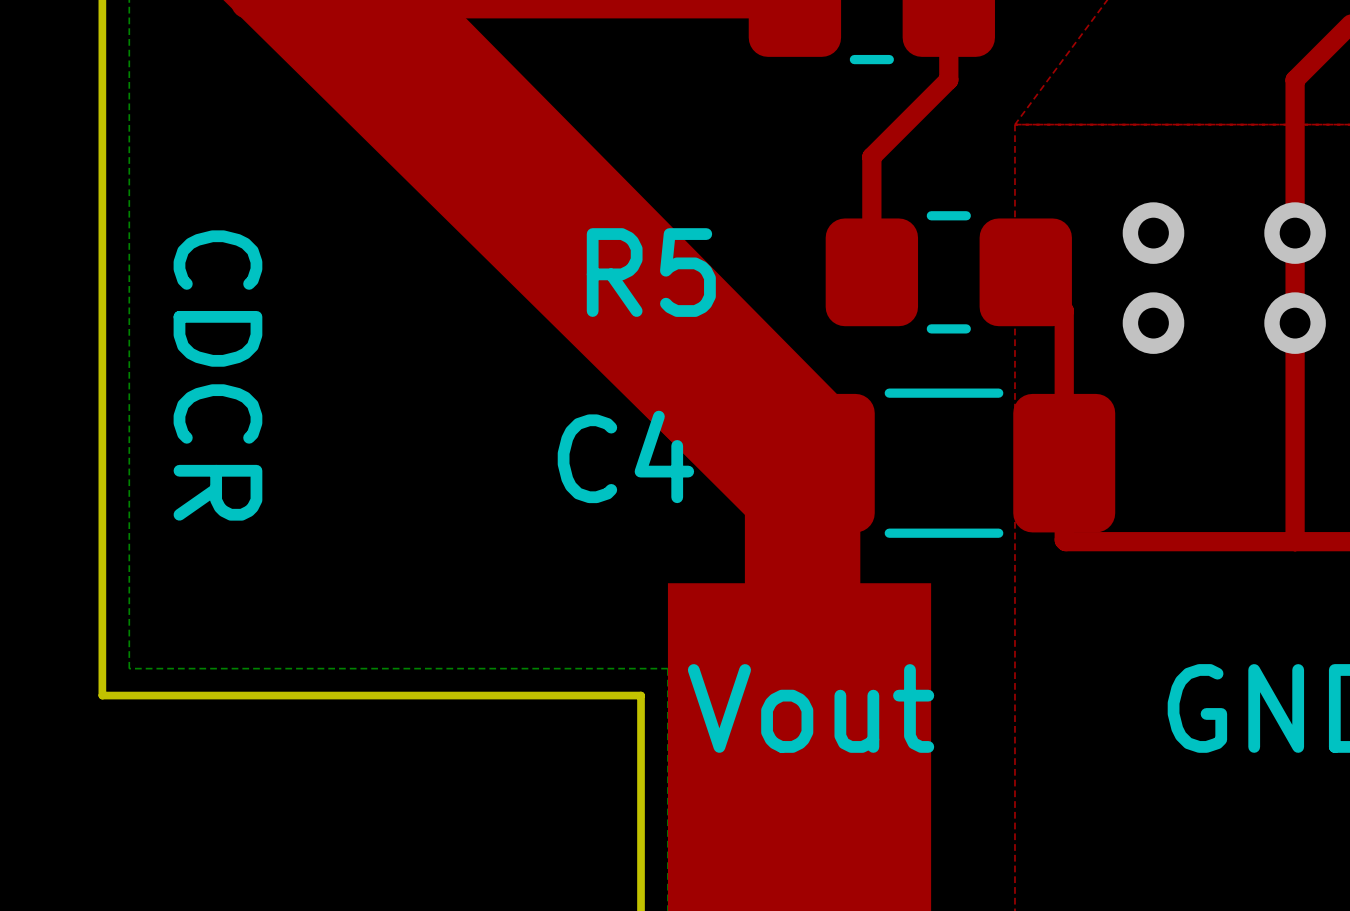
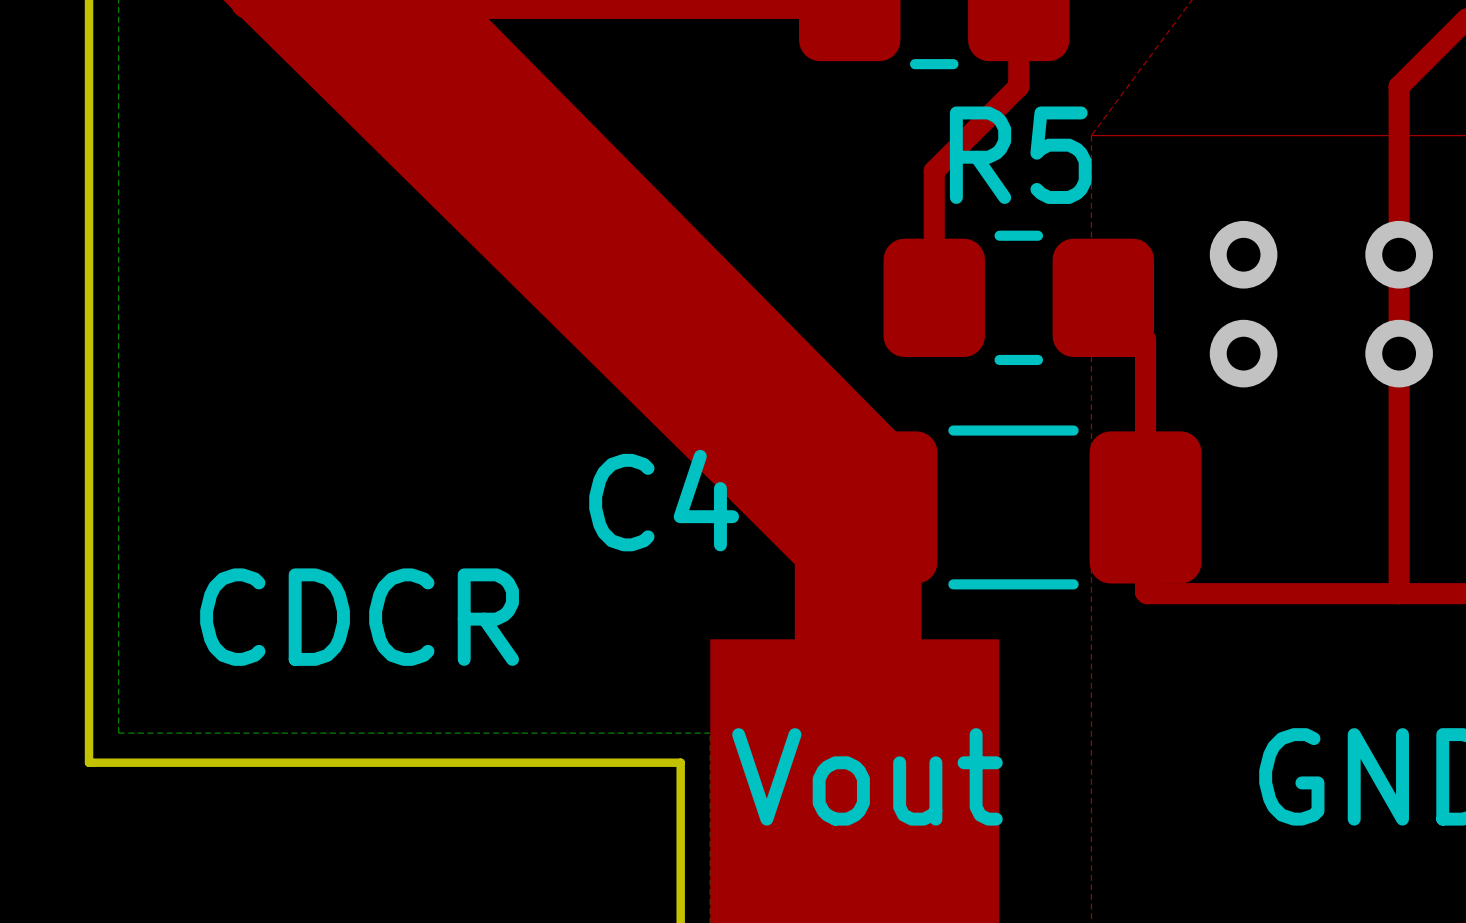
R5 name position: R5 (651, 272) -> R5 (1020, 155)
text rotation: 0° (217, 375) -> 90° counterclockwise (359, 617)

